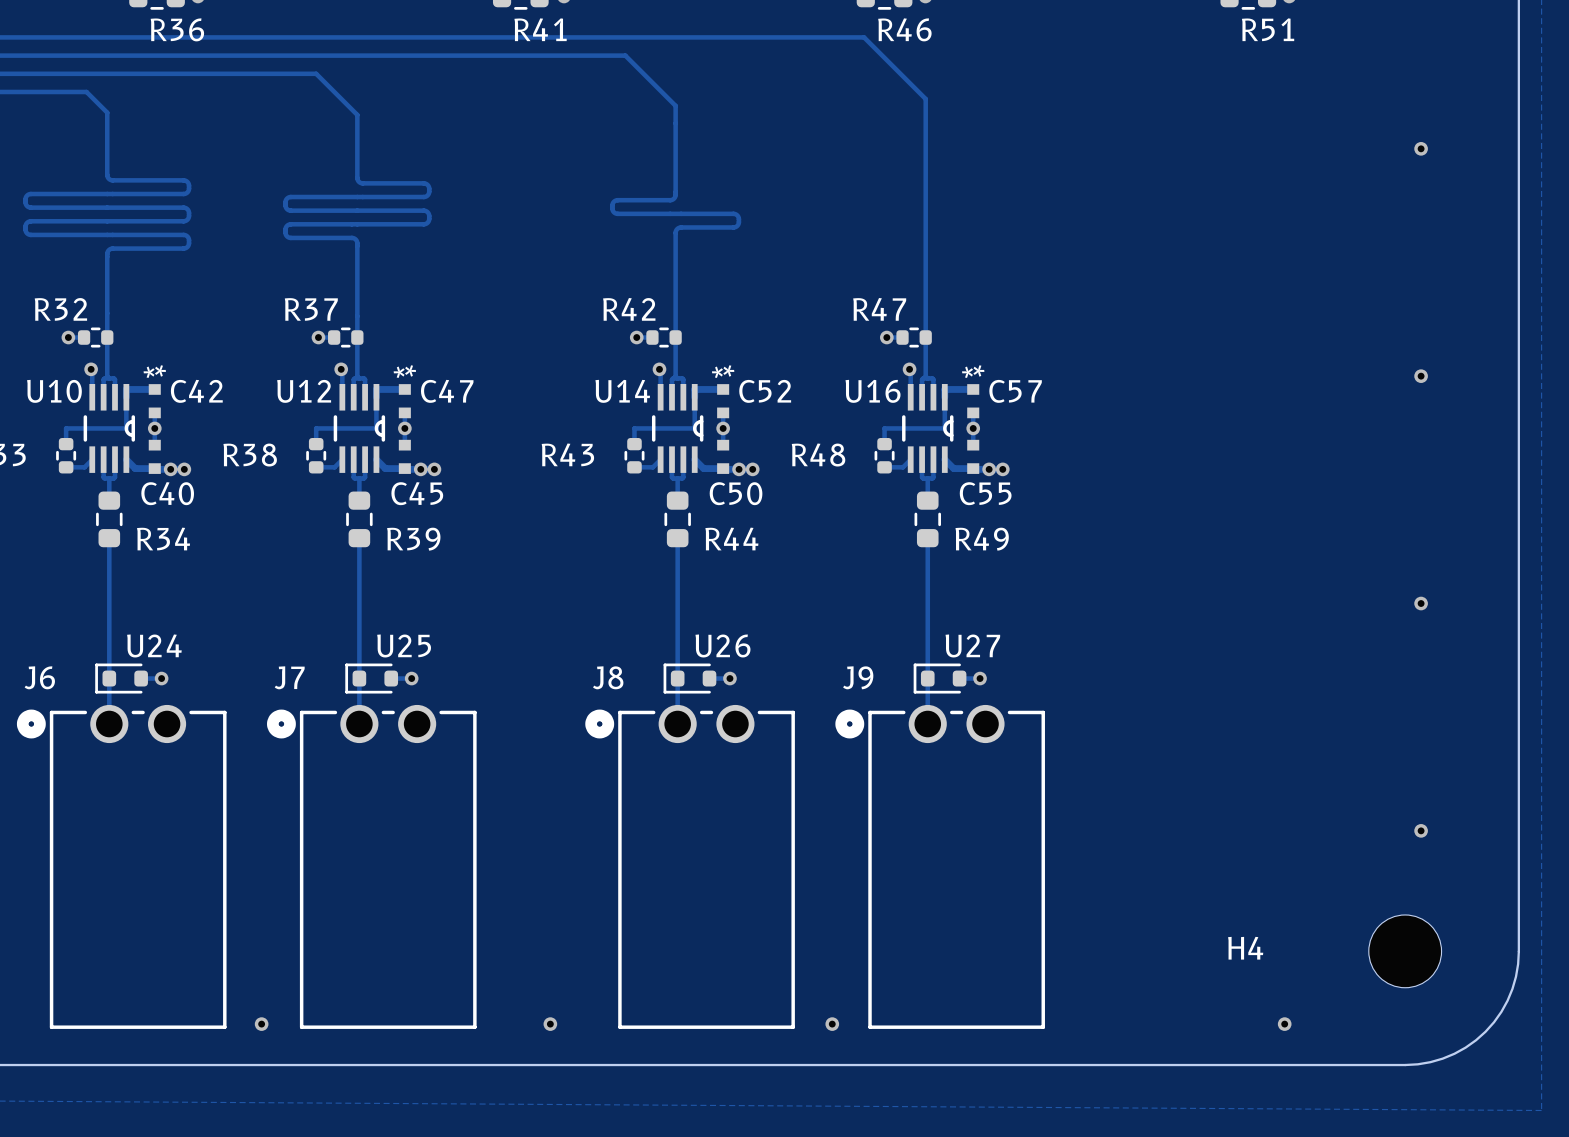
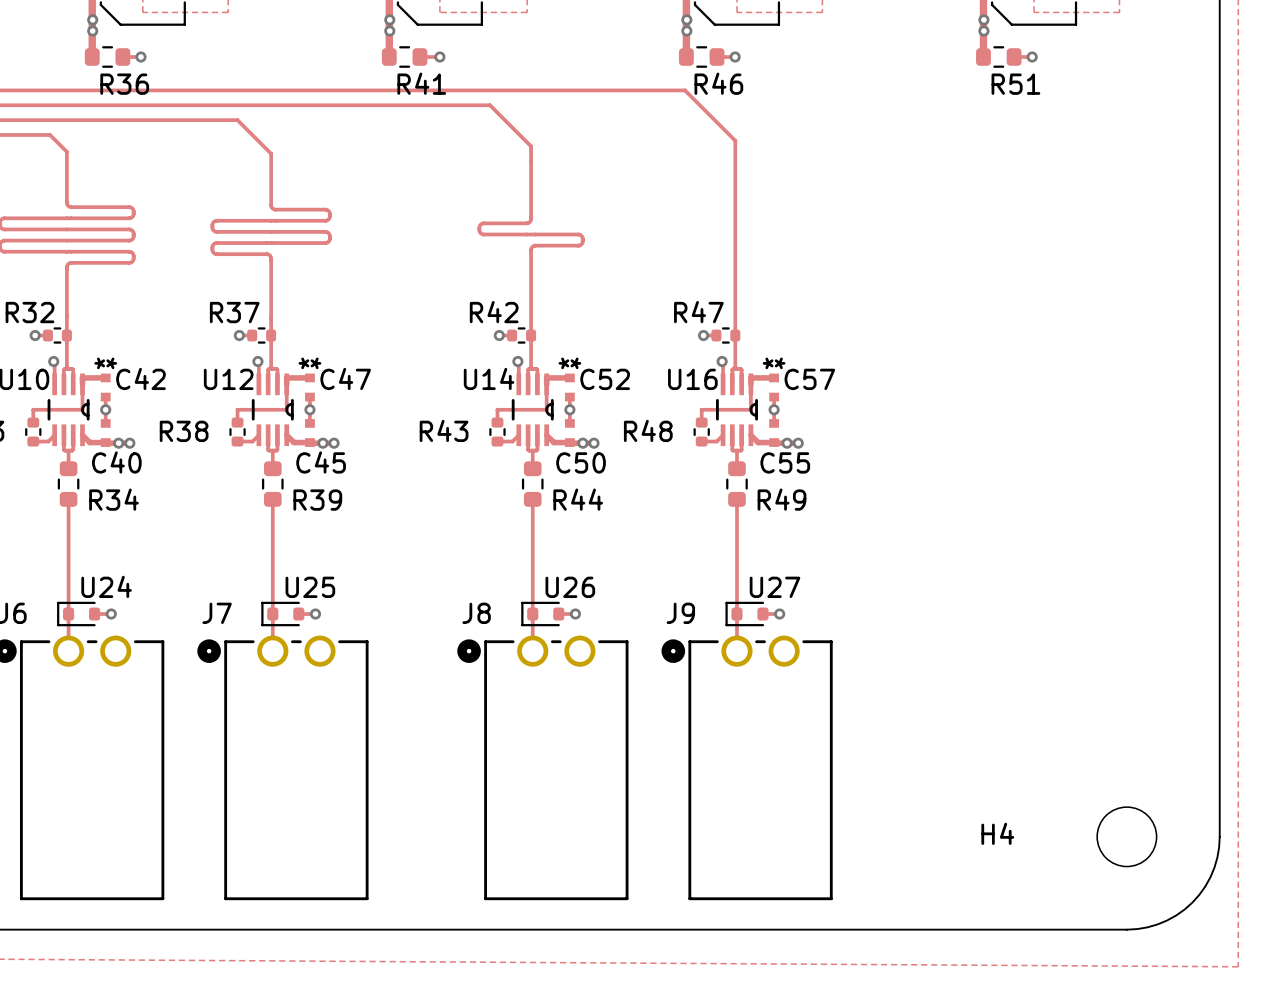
via: (1421, 148) -> none
via: (1421, 376) -> none
via: (1421, 603) -> none
via: (1421, 830) -> none
via: (261, 1024) -> none
via: (550, 1024) -> none
via: (832, 1024) -> none
via: (1284, 1024) -> none

